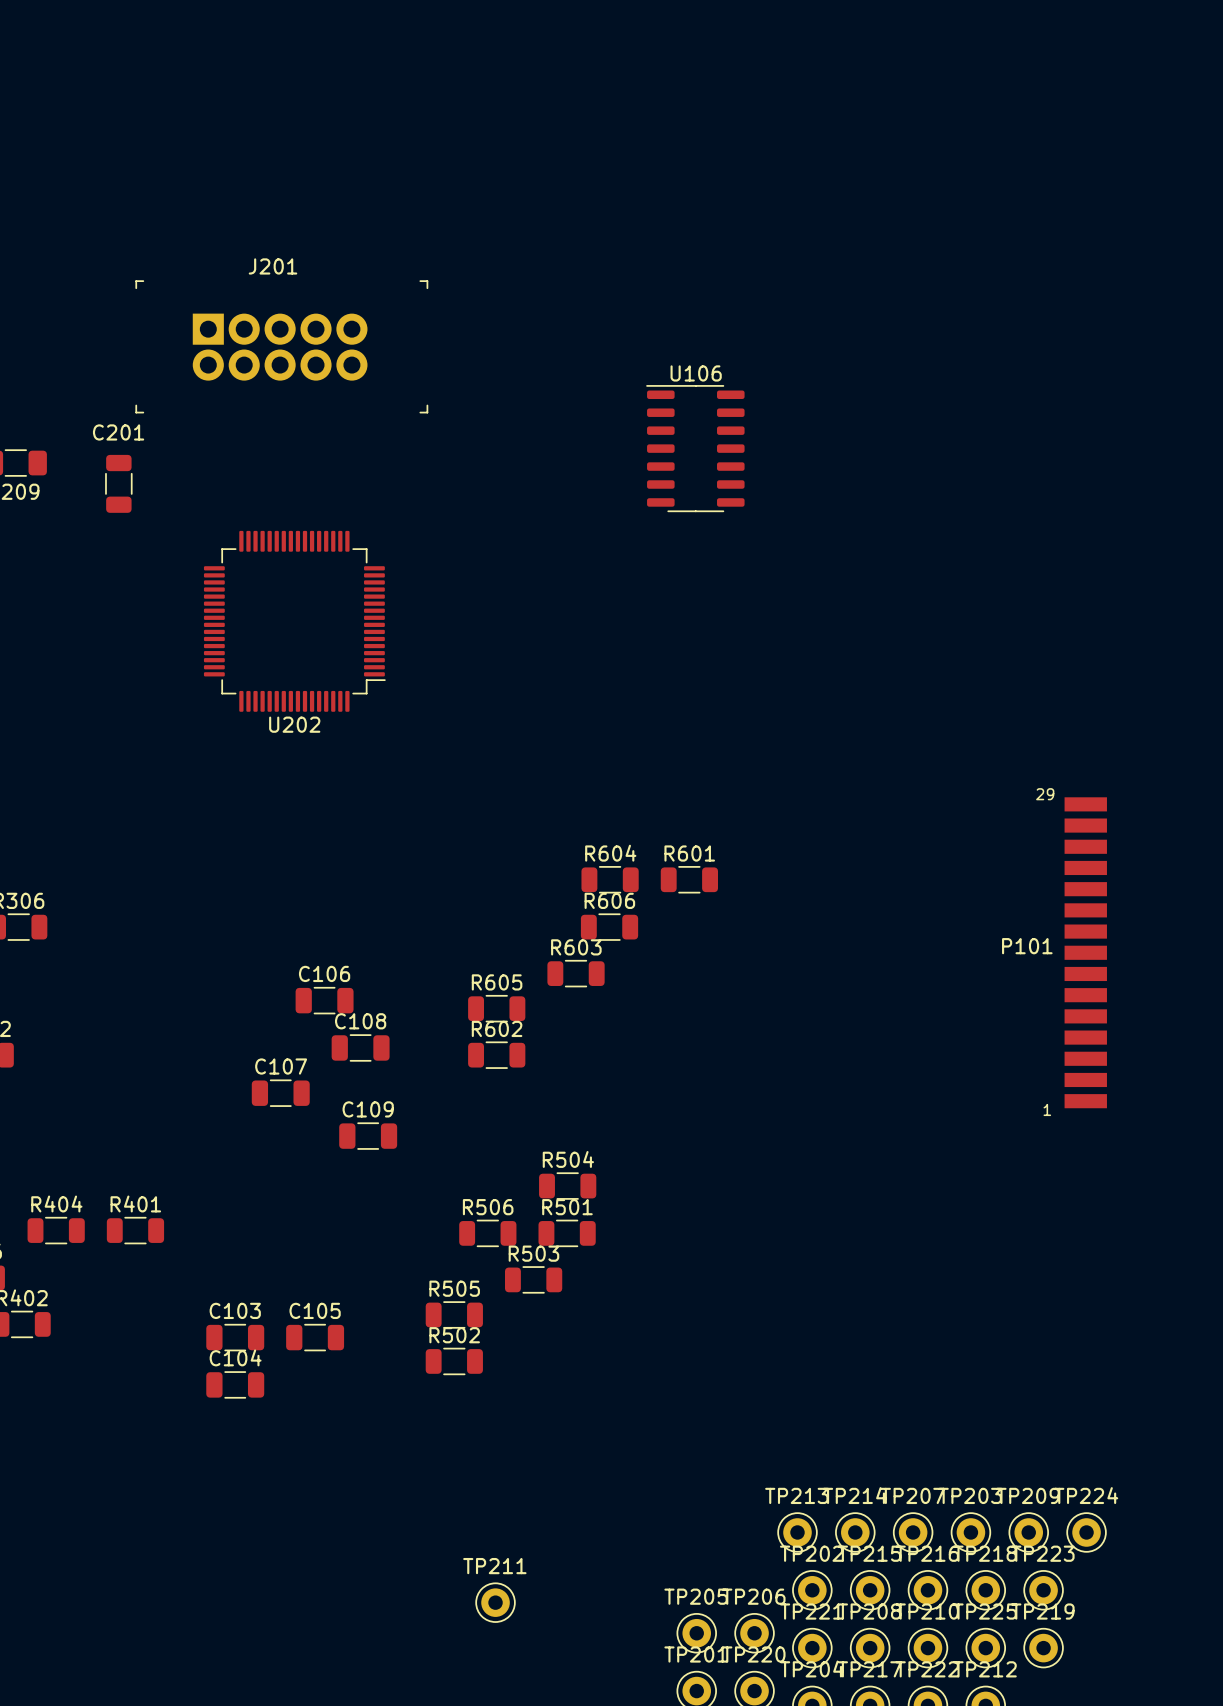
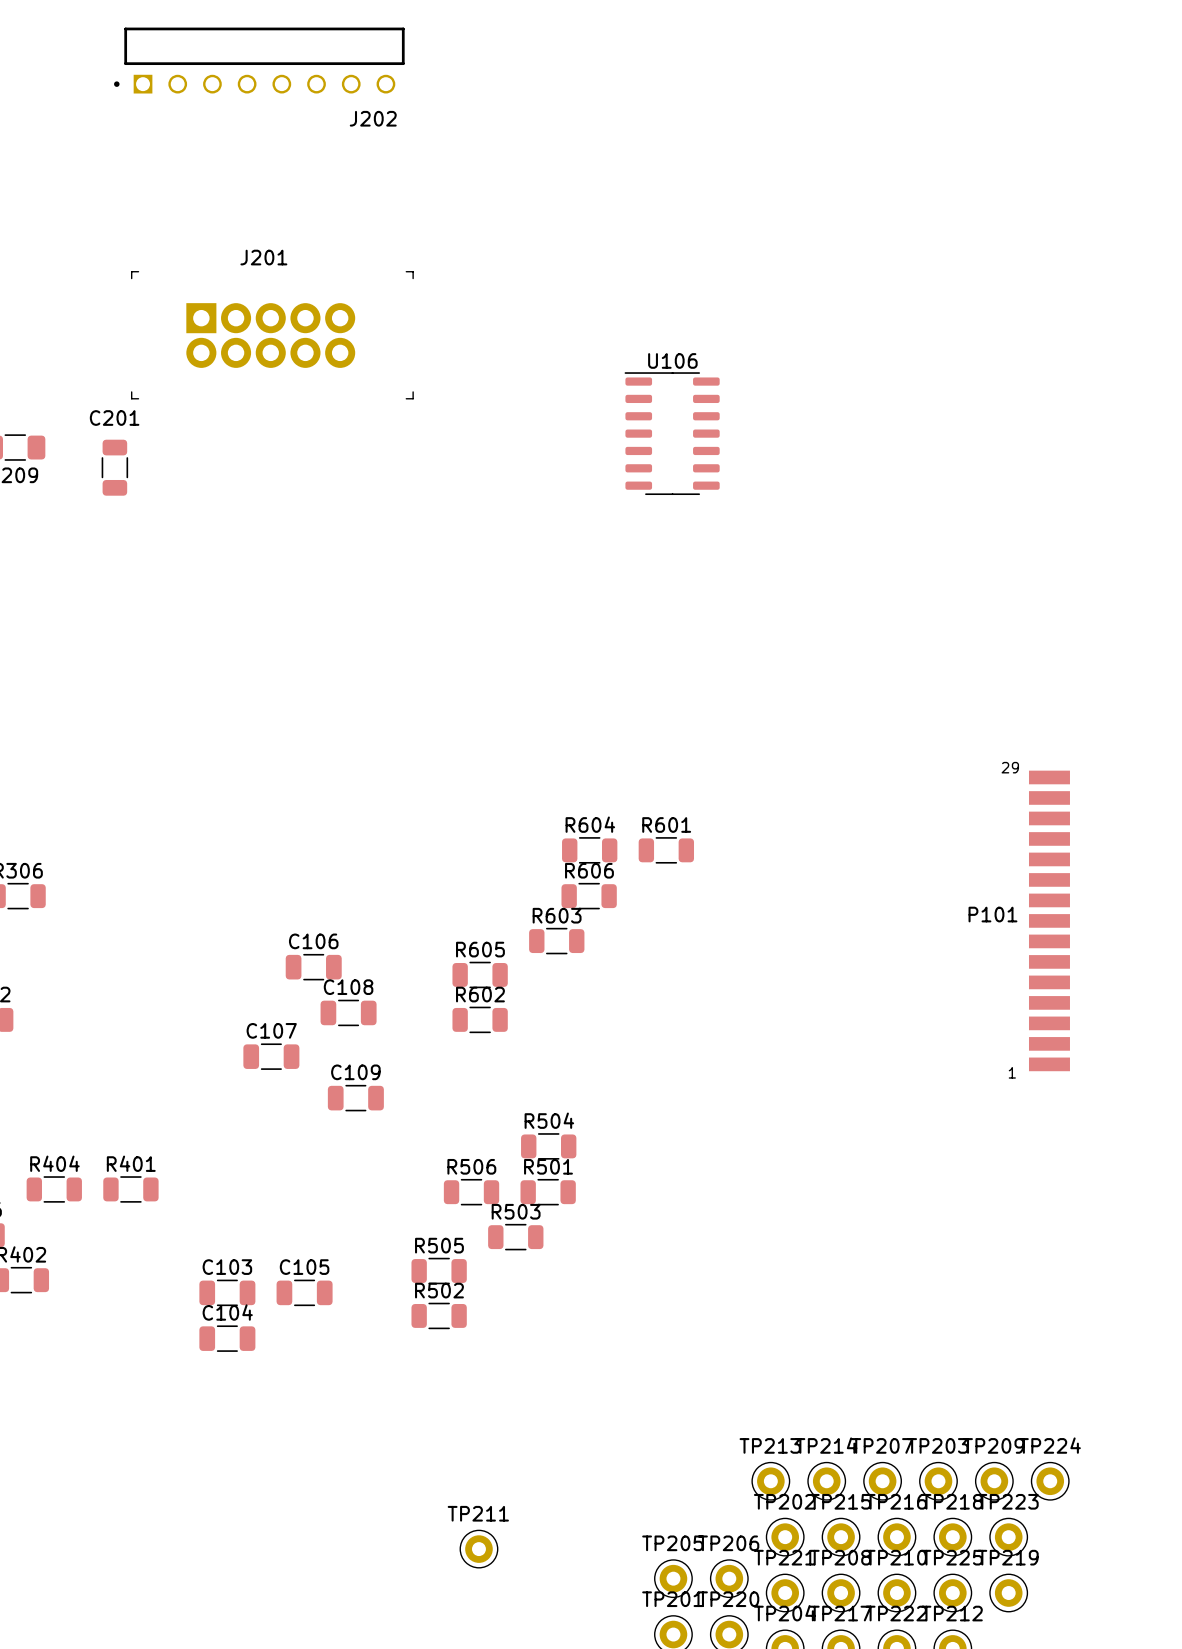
J202: none -> (259, 60)
U202: (294, 621) -> none

